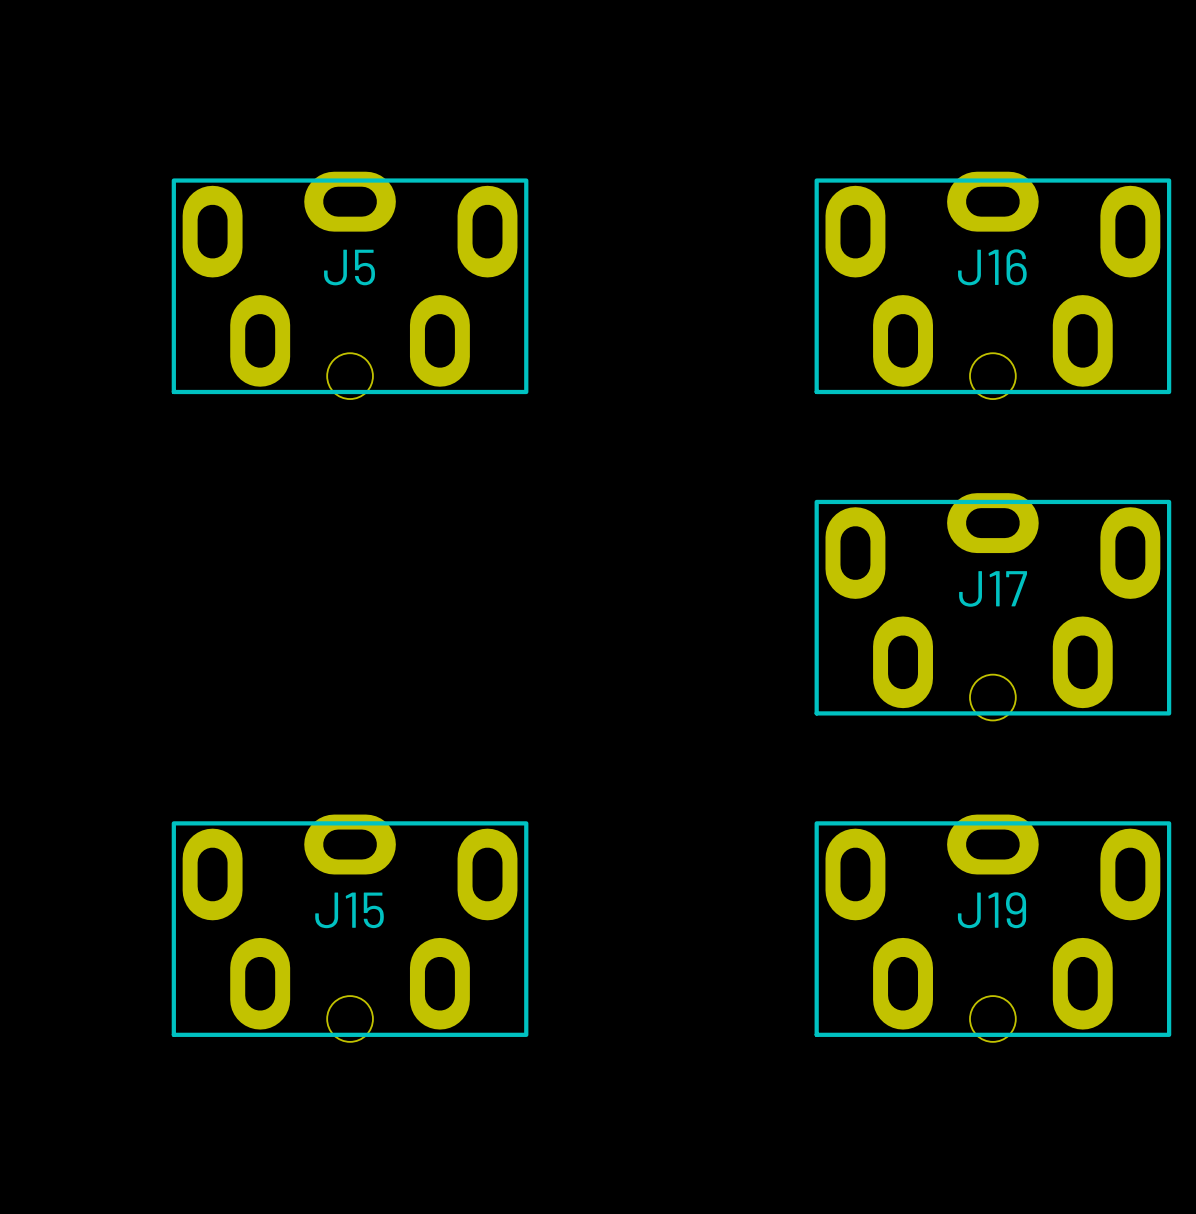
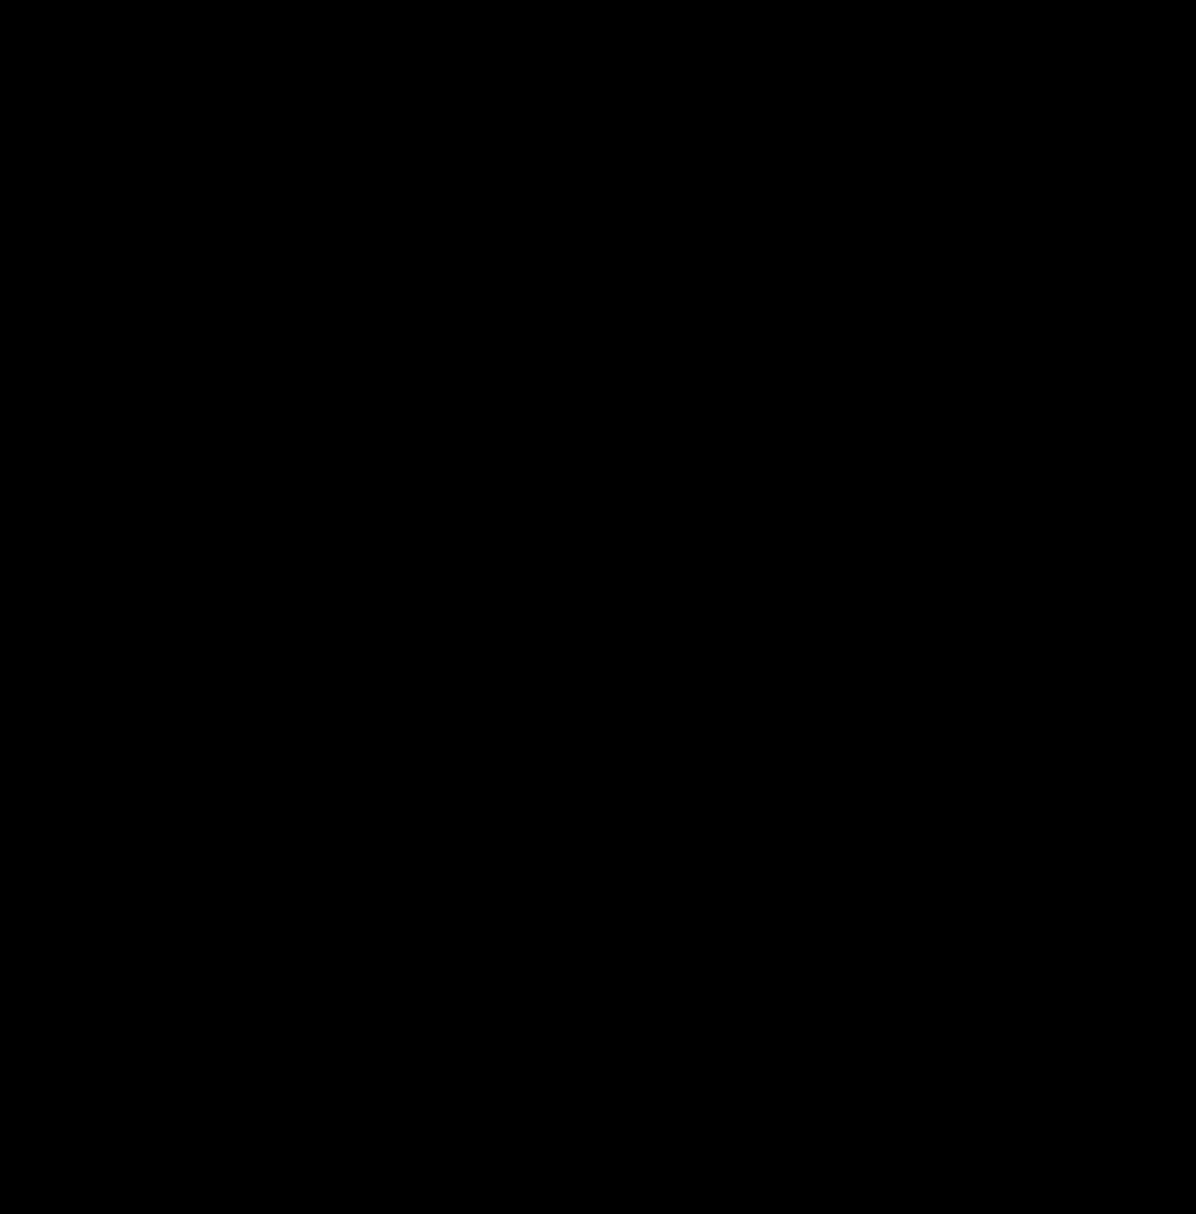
J5: (350, 285) -> none
J16: (992, 285) -> none
J17: (992, 606) -> none
J15: (350, 928) -> none
J19: (992, 928) -> none

